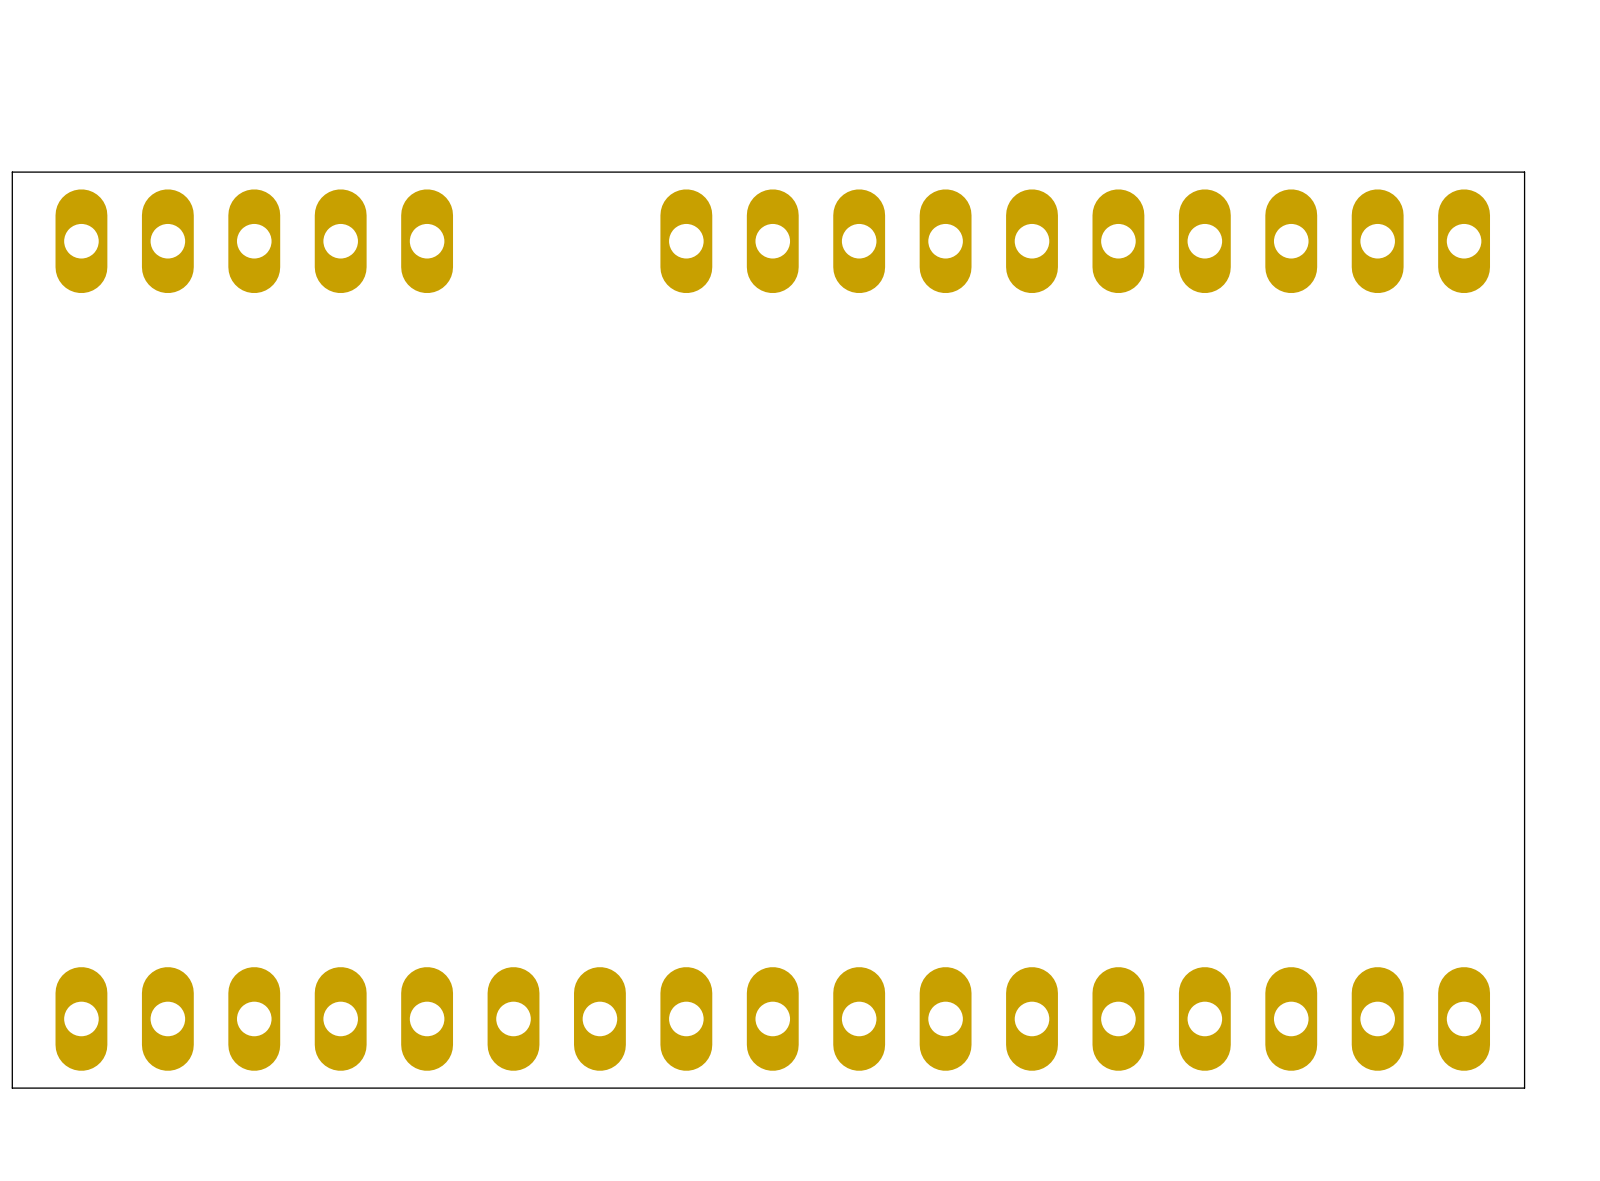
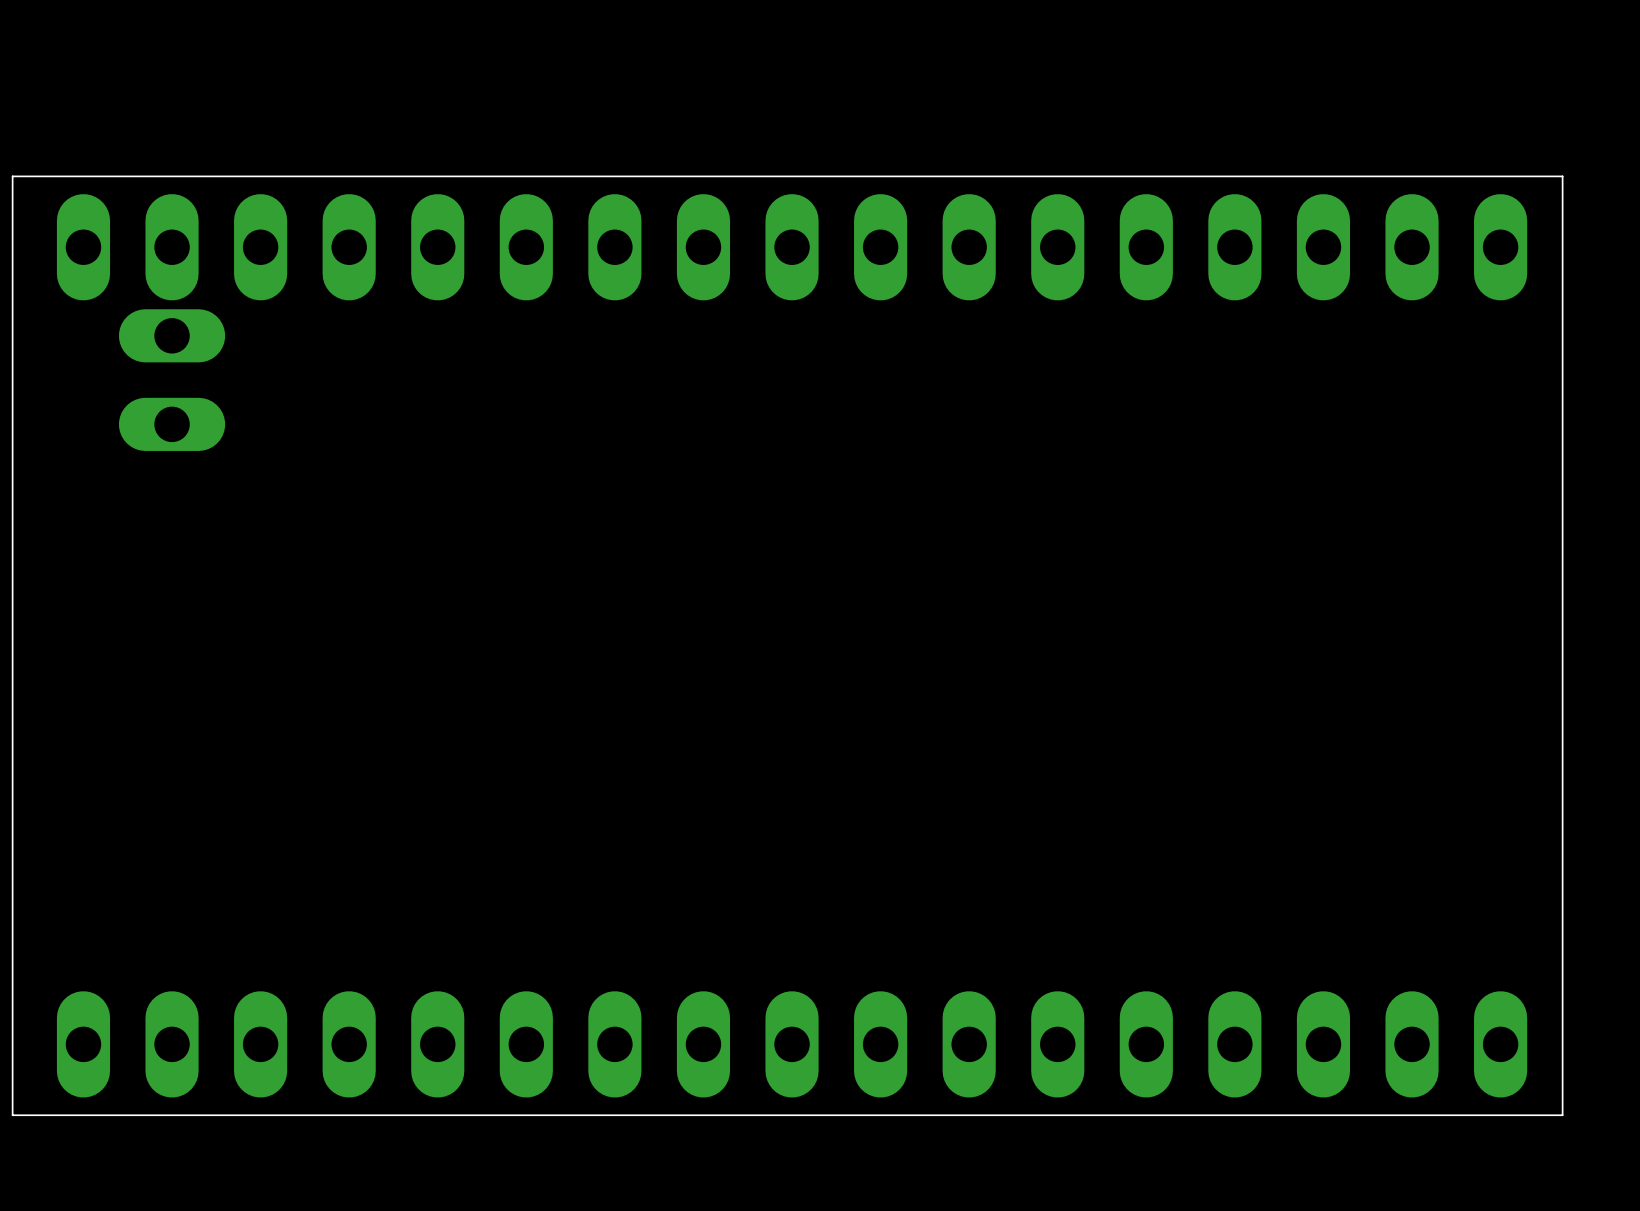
part: none -> (792, 247)
part: none -> (172, 380)

